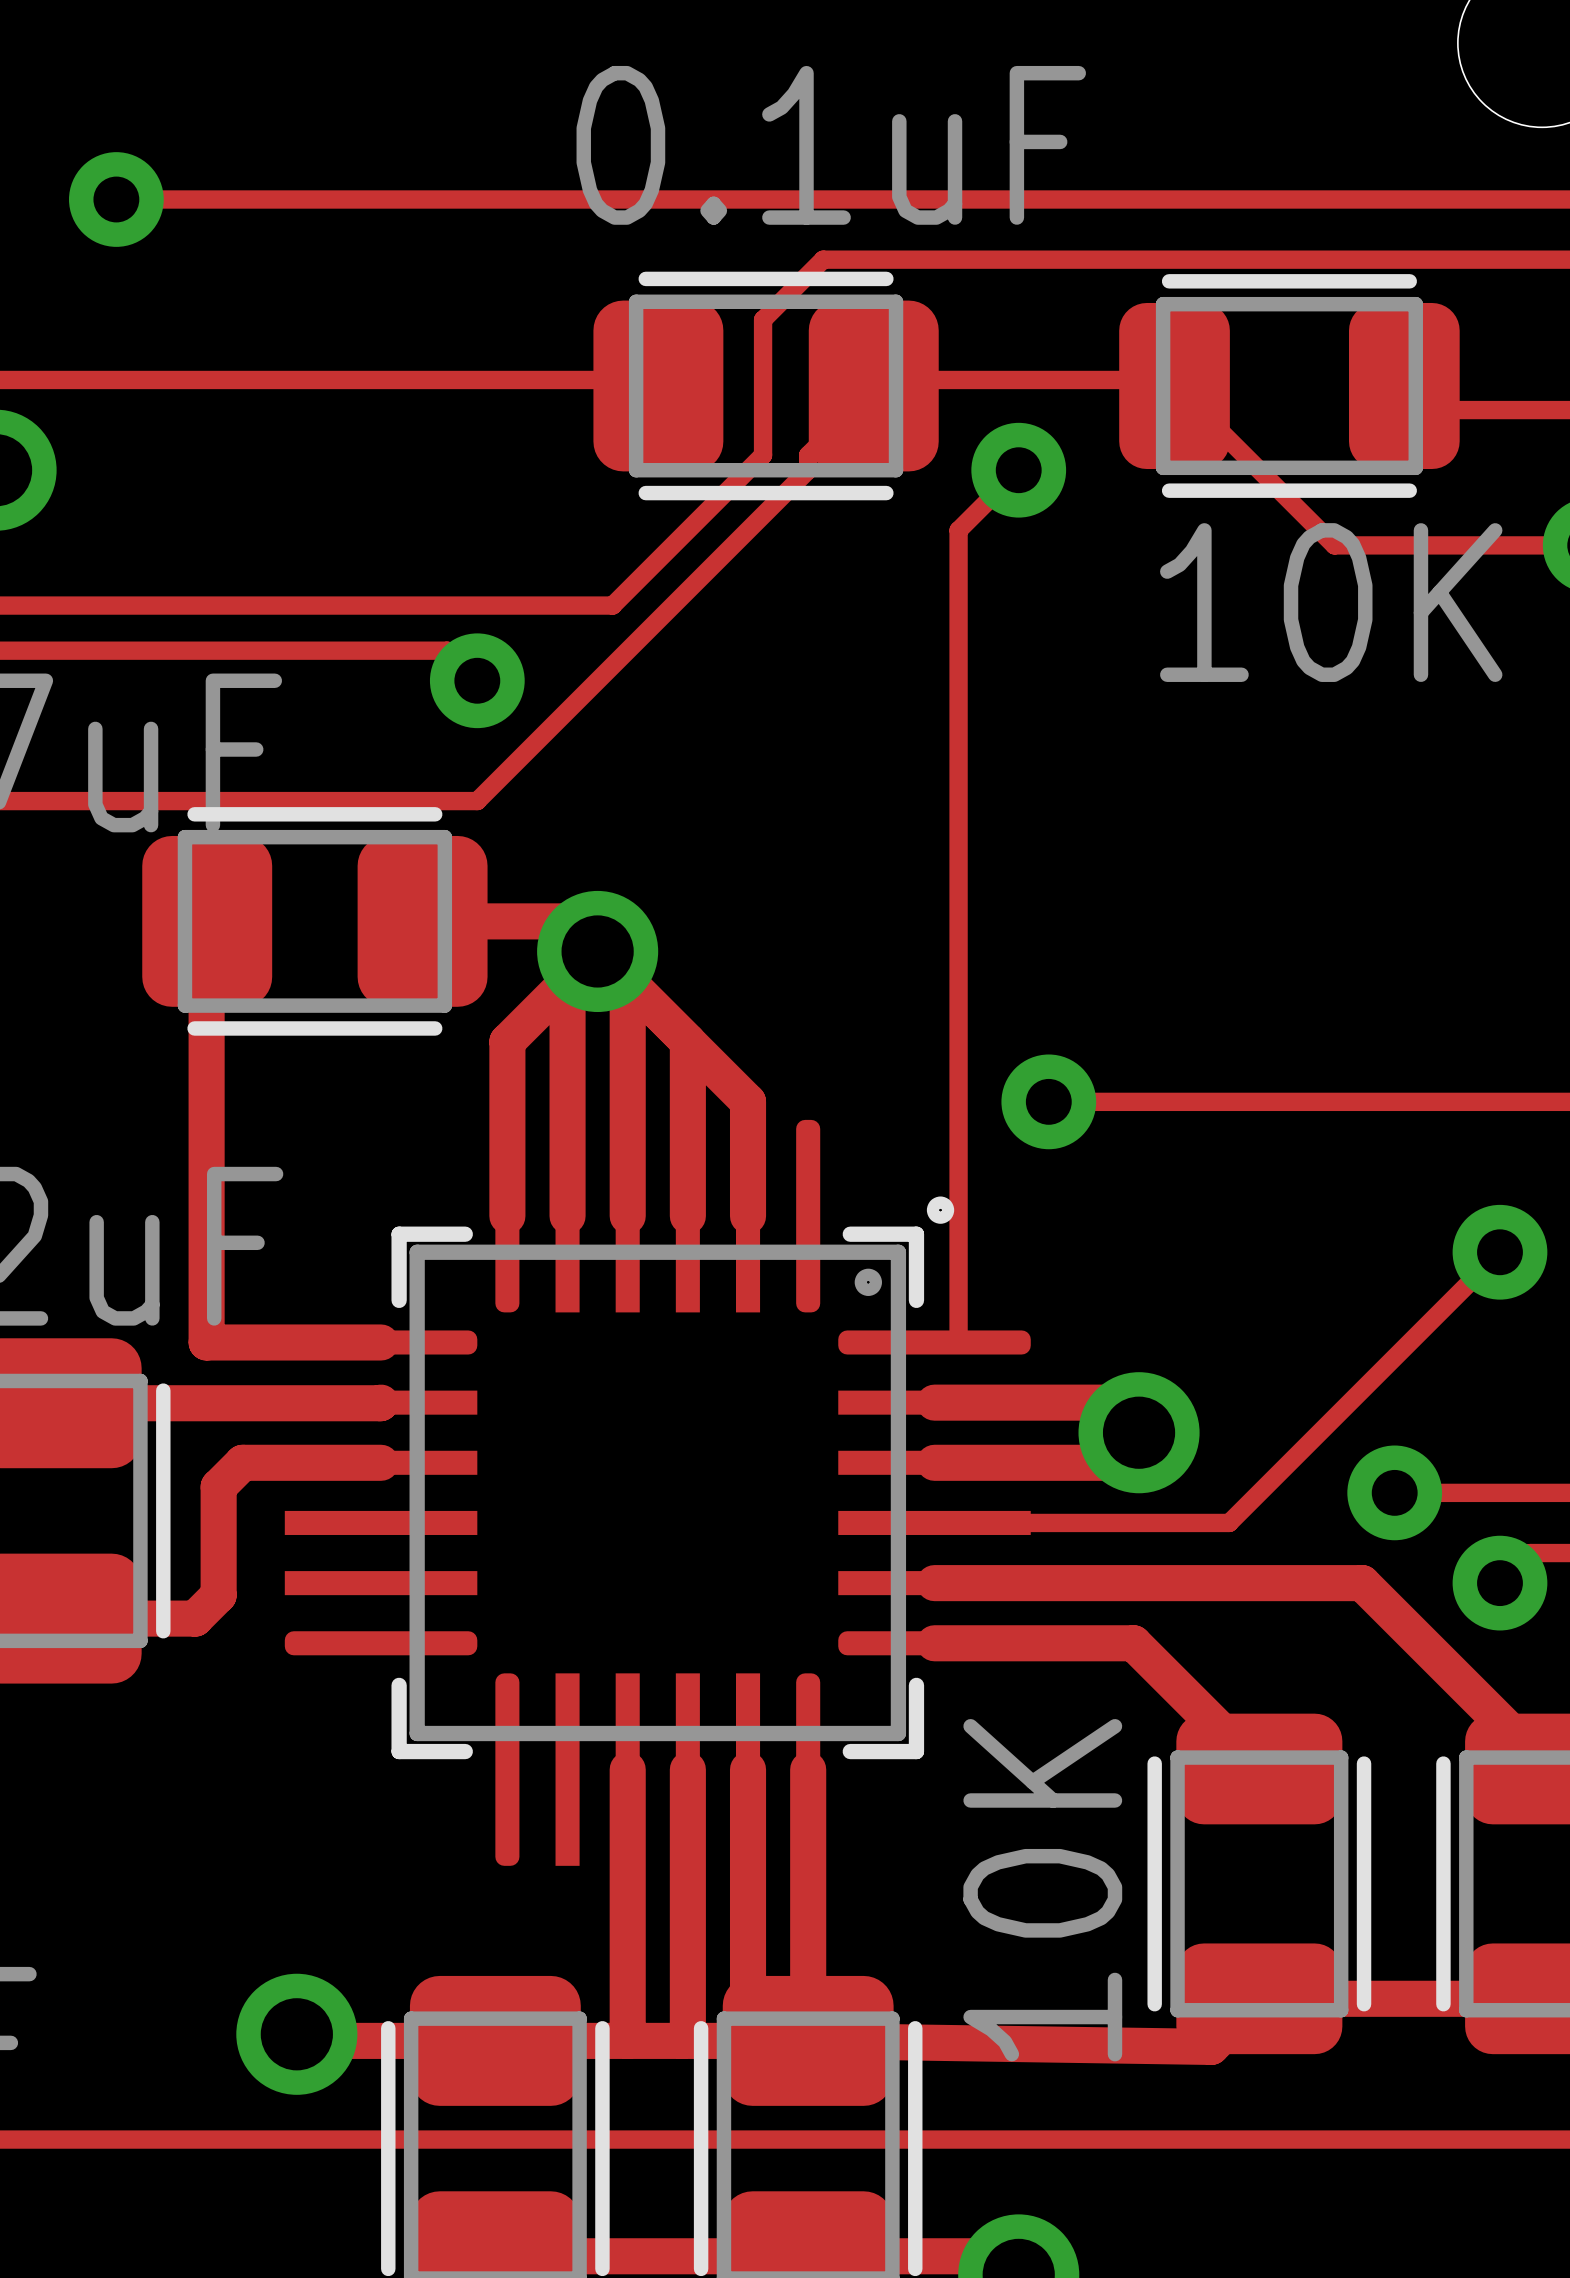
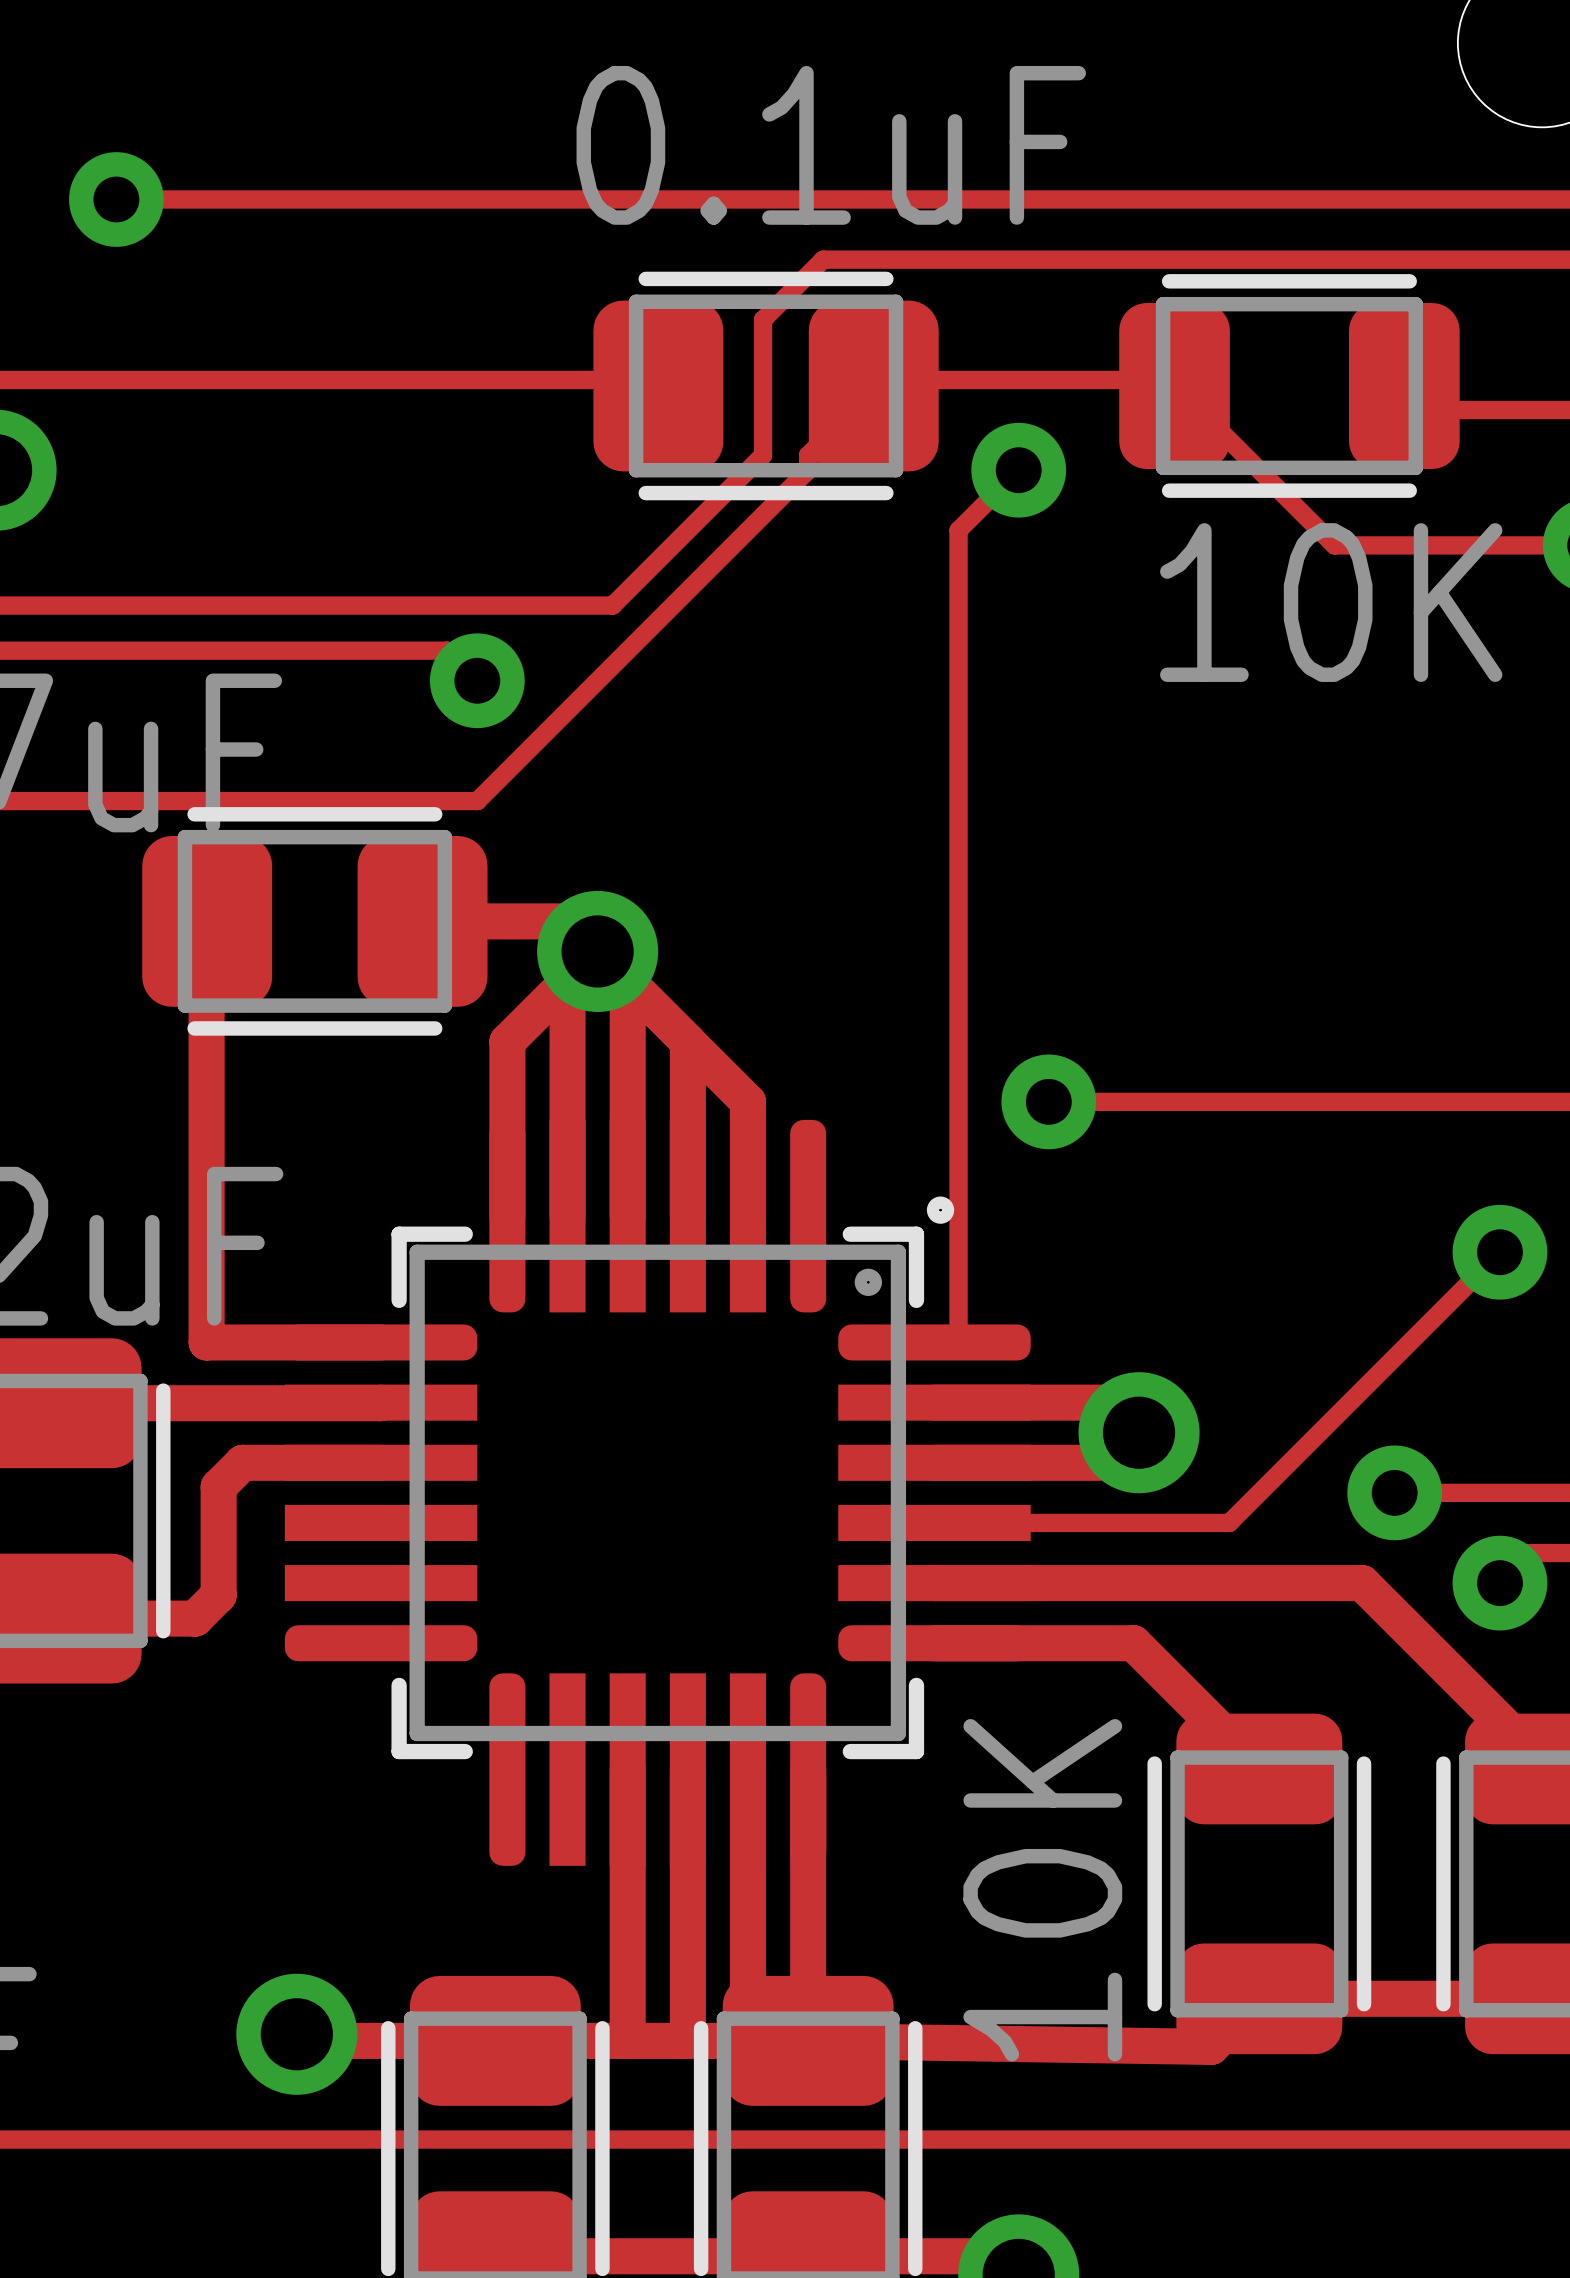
part footprint: [284, 1119, 1031, 1866] -> [284, 1119, 1031, 1866]

